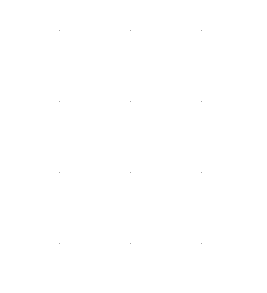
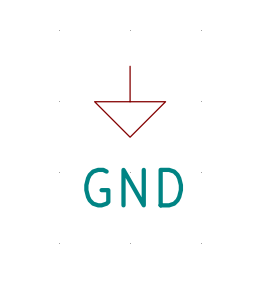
power symbol: none -> GND (130, 101)

